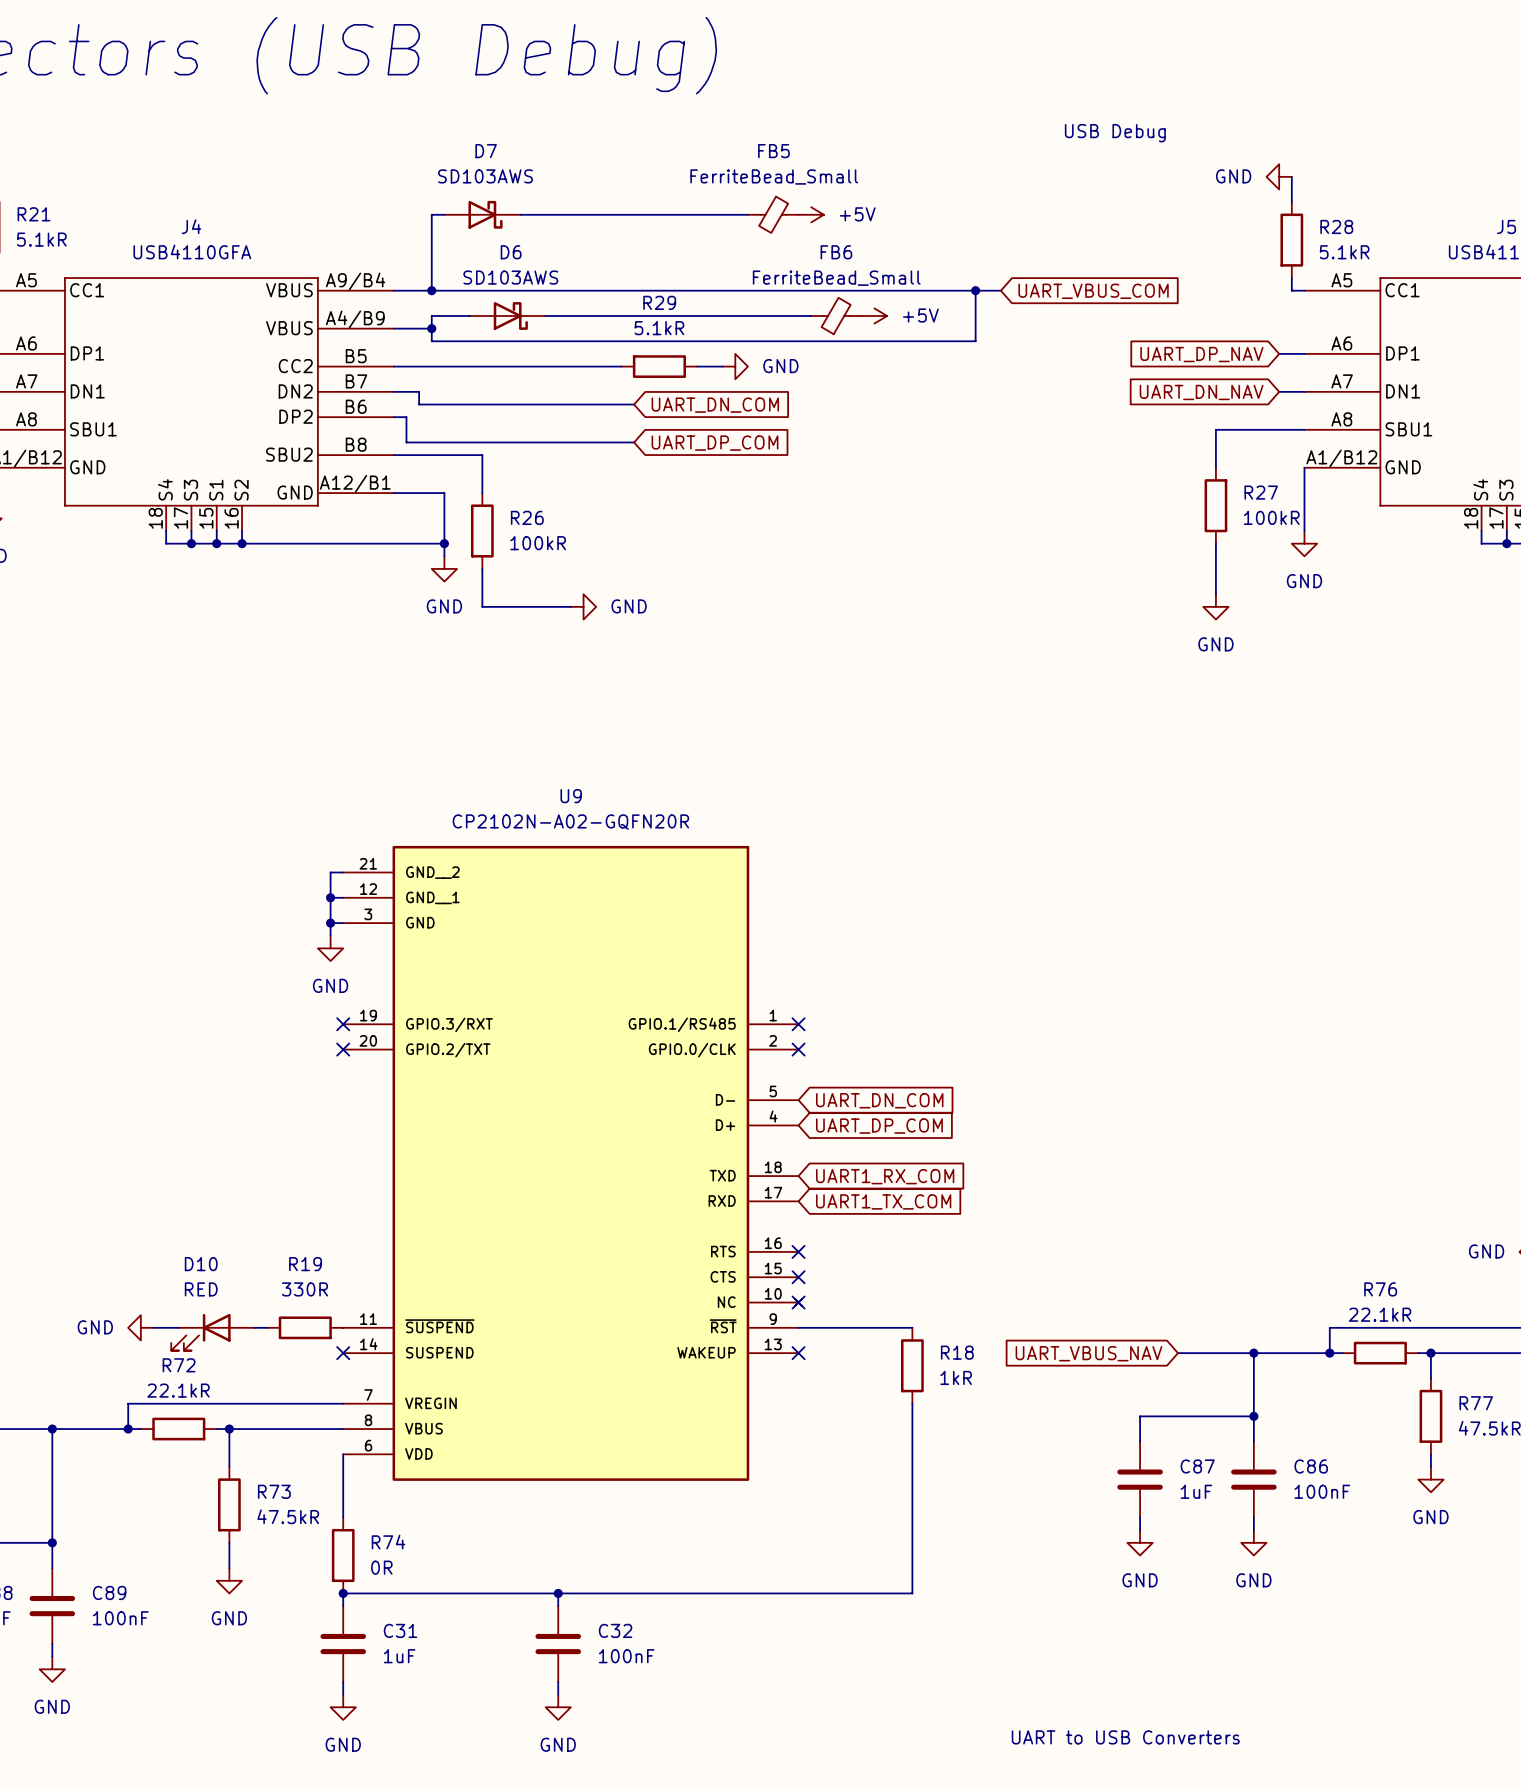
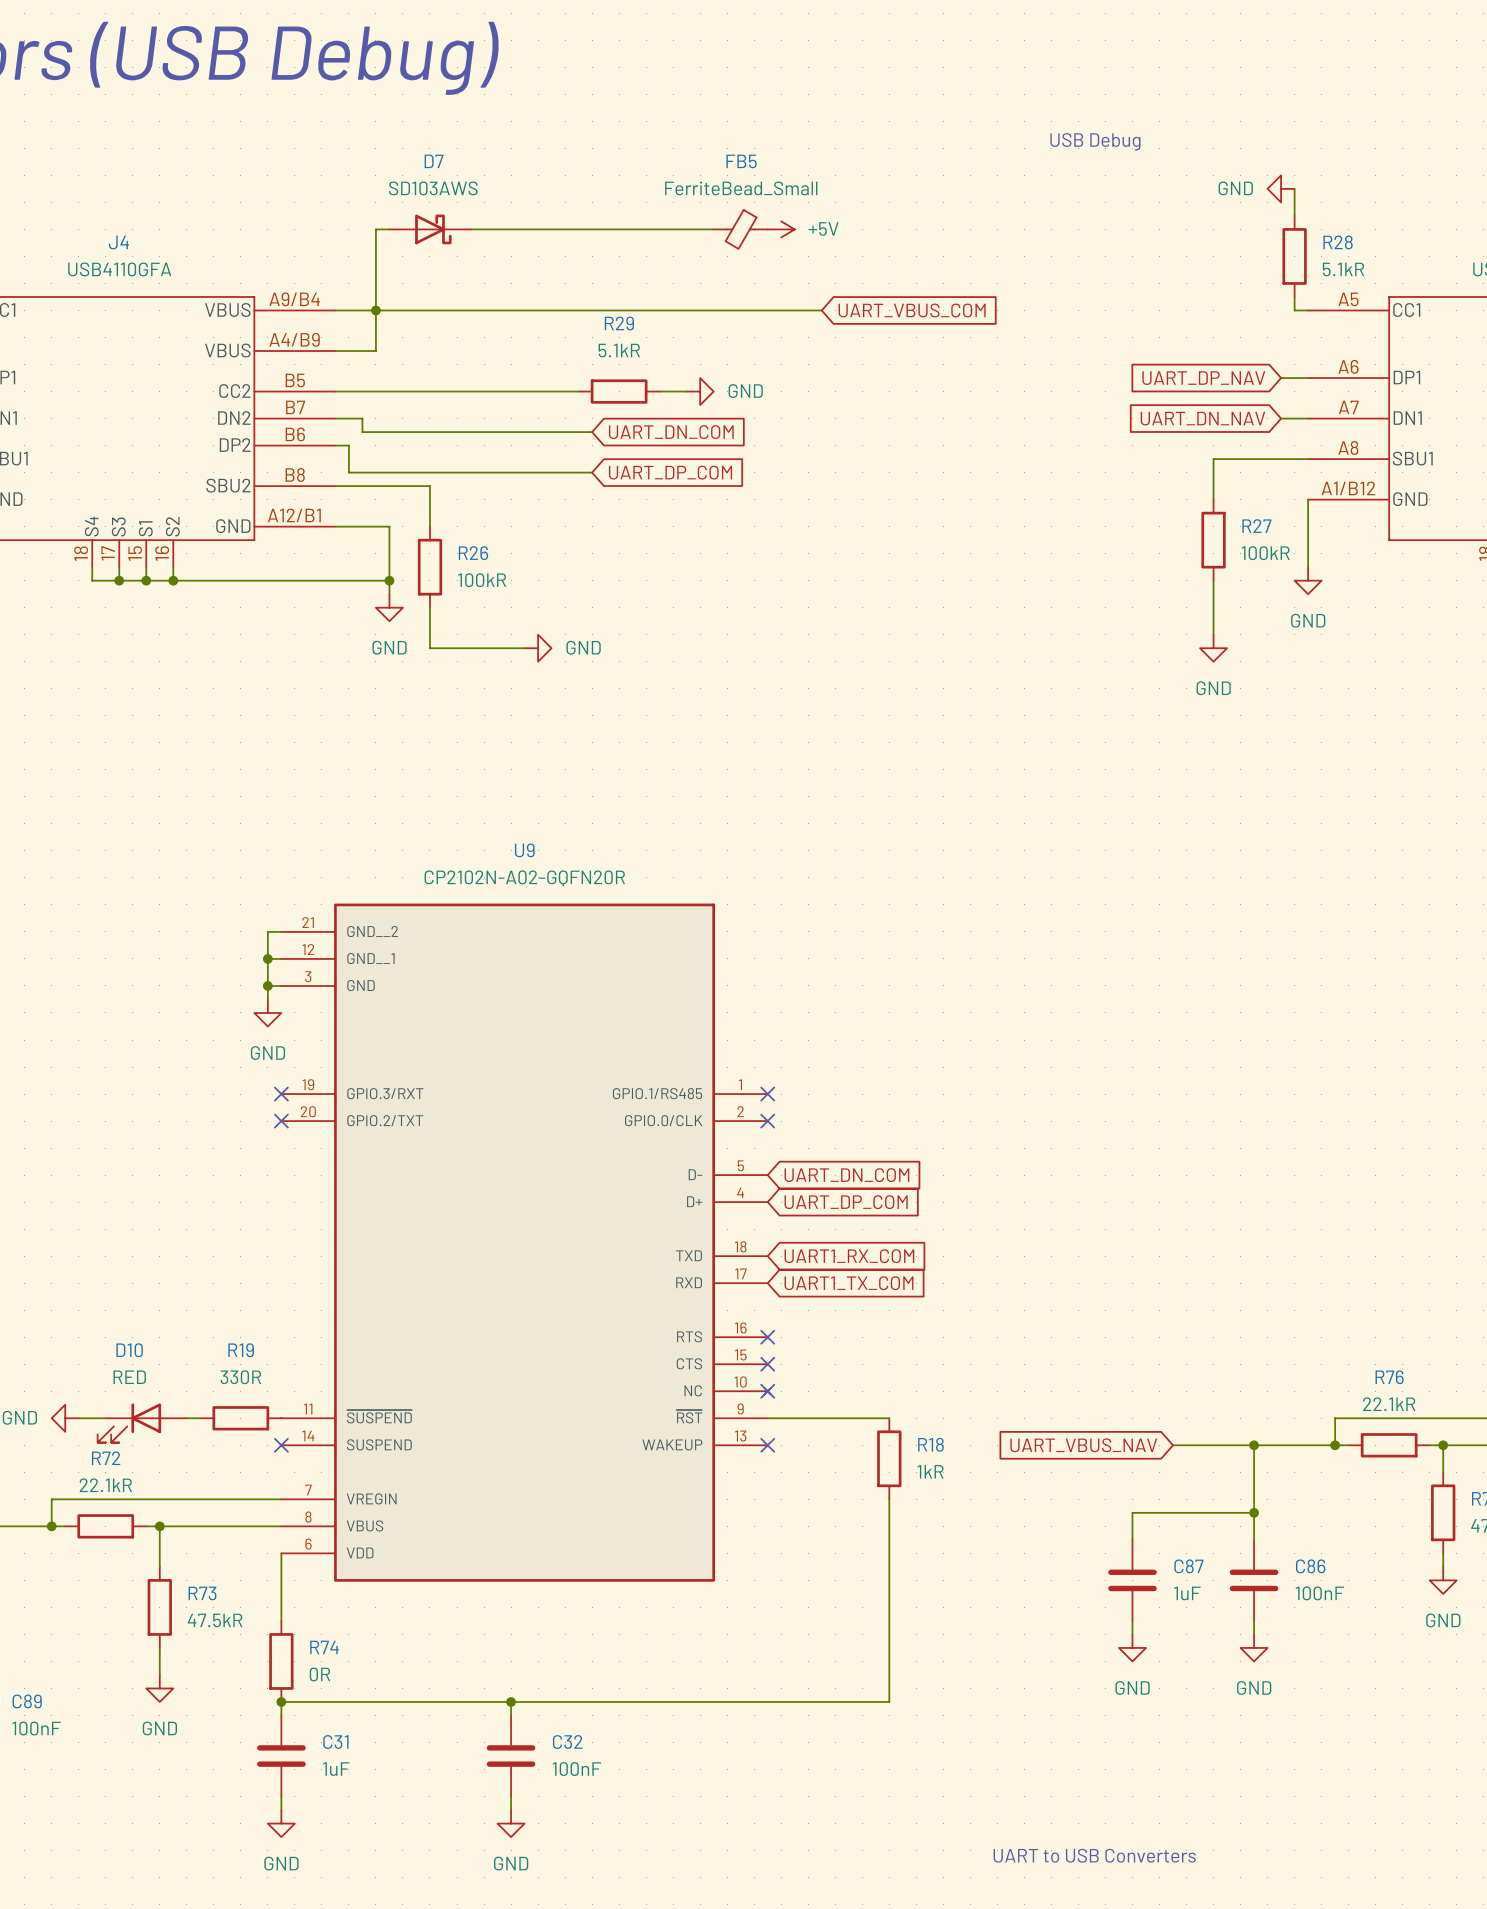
wire: (849, 290) (1000, 290) -> none
wire: (975, 290) (975, 341) (431, 341) (431, 328) -> none
junction: (975, 290) -> none
global label position: UART_VBUS_COM (1093, 291) -> UART_VBUS_COM (912, 310)
wire: (431, 315) (469, 315) -> (375, 337) (375, 310)
D6: SD103AWS (507, 315) -> none
wire: (545, 315) (811, 315) -> none
FB6: FerriteBead_Small (836, 315) -> none
power symbol: +5V (874, 315) -> none
junction: (431, 328) -> none

